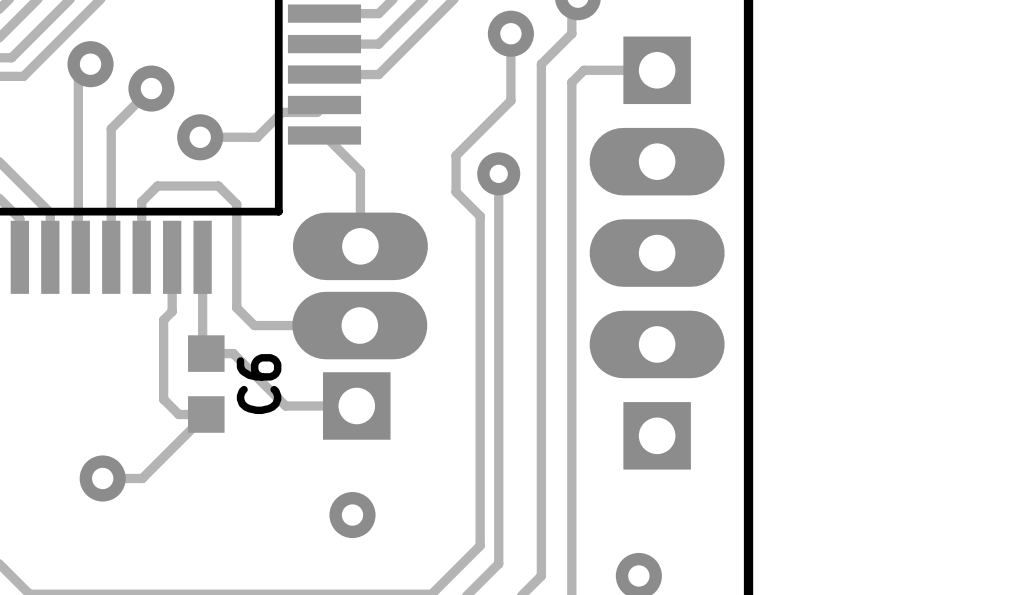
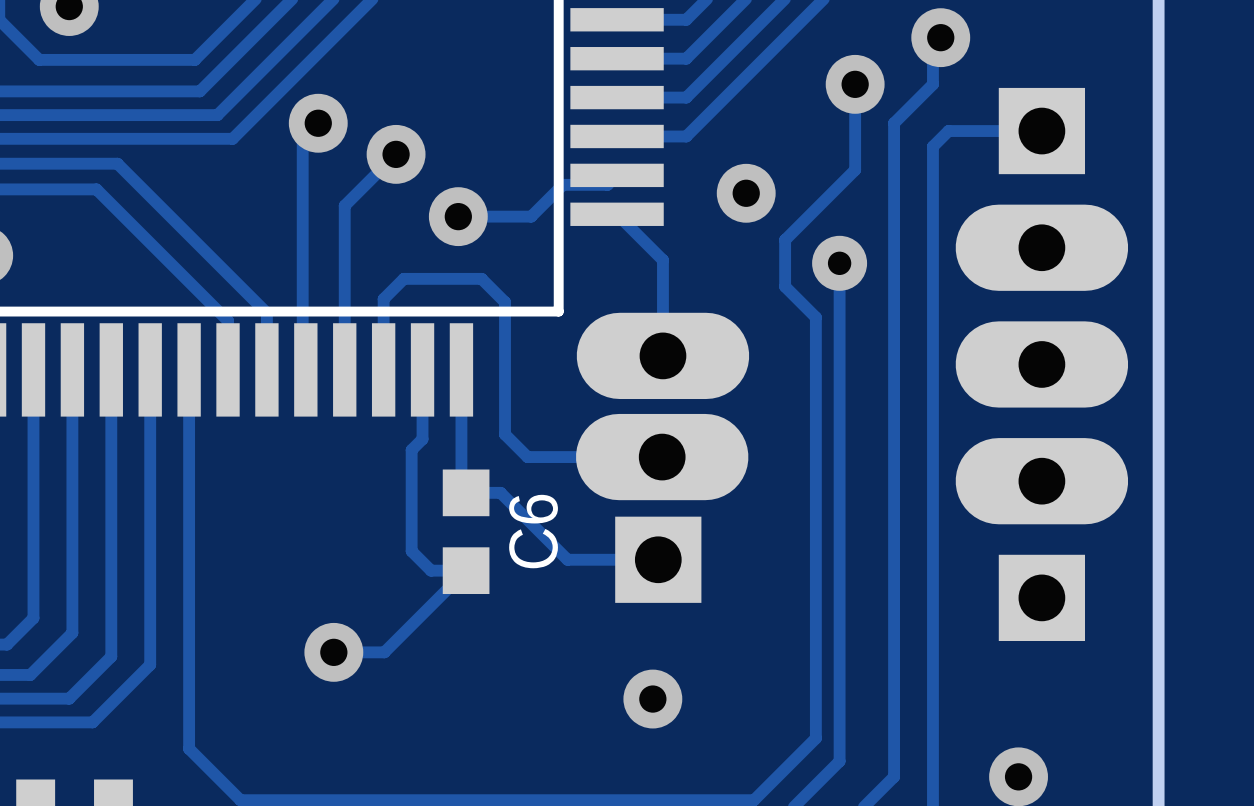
via: none -> (746, 193)

